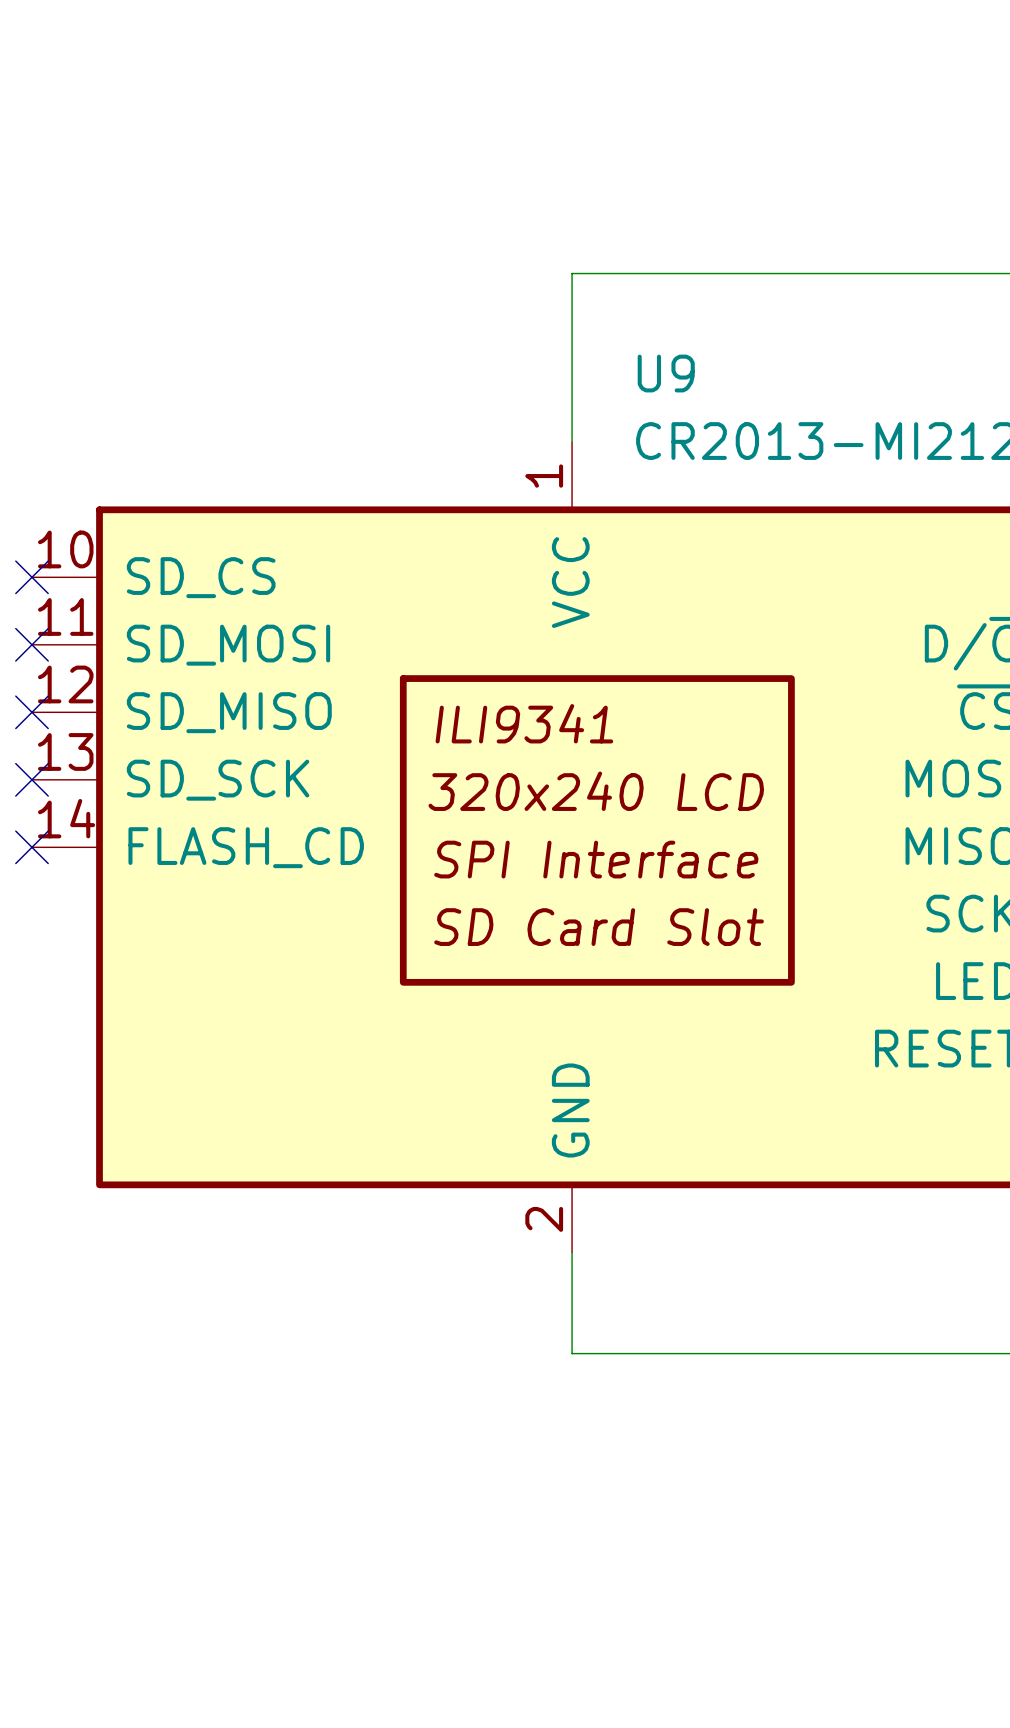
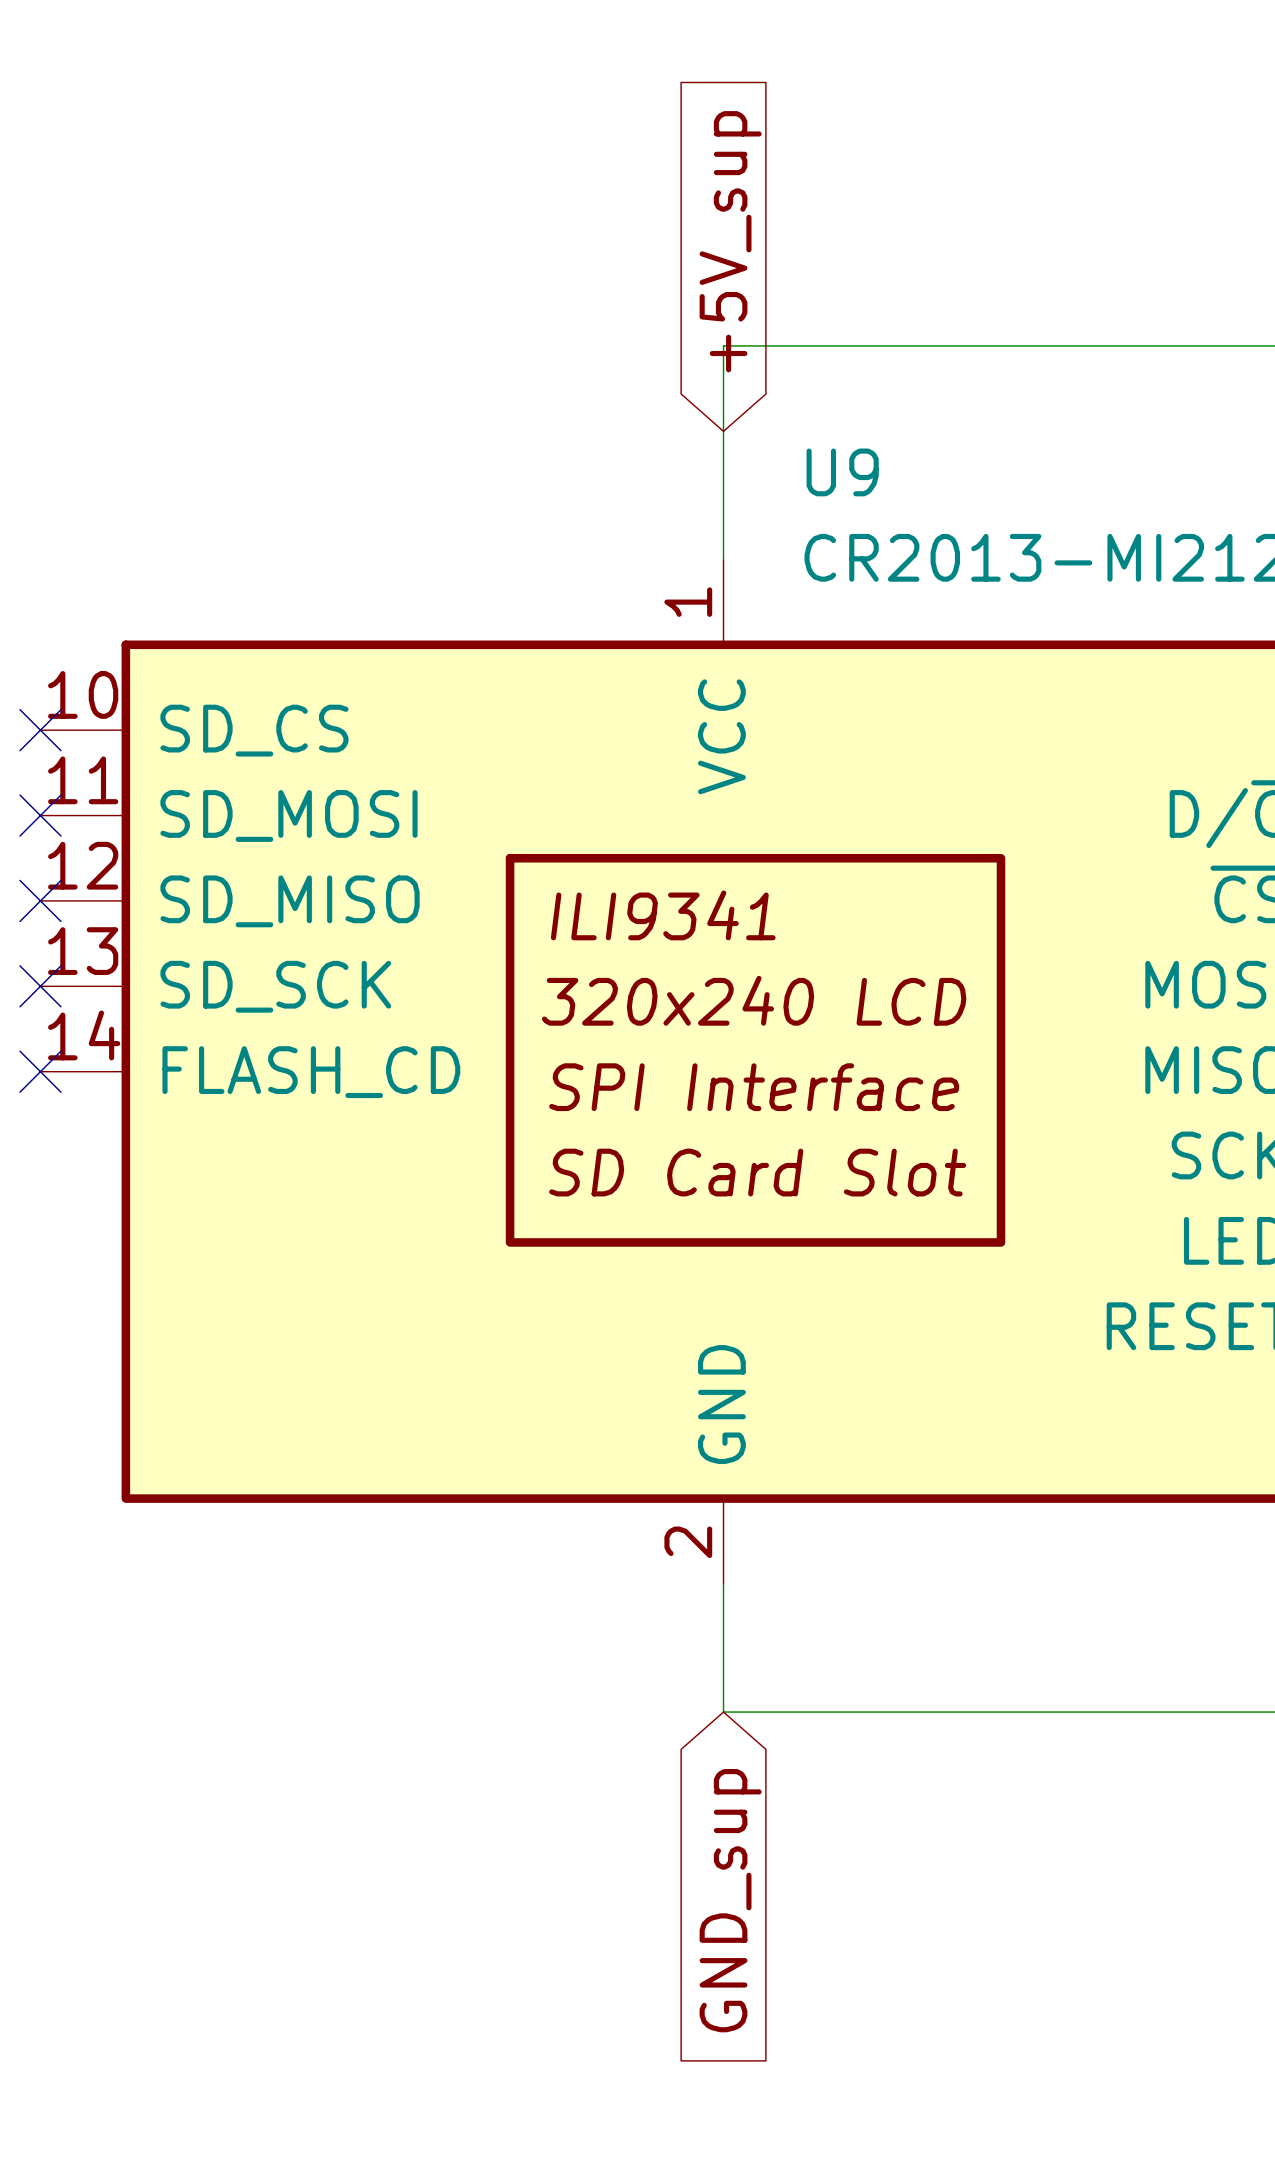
global label: none -> +5V_sup (730, 241)
global label: none -> GND_sup (730, 1900)

